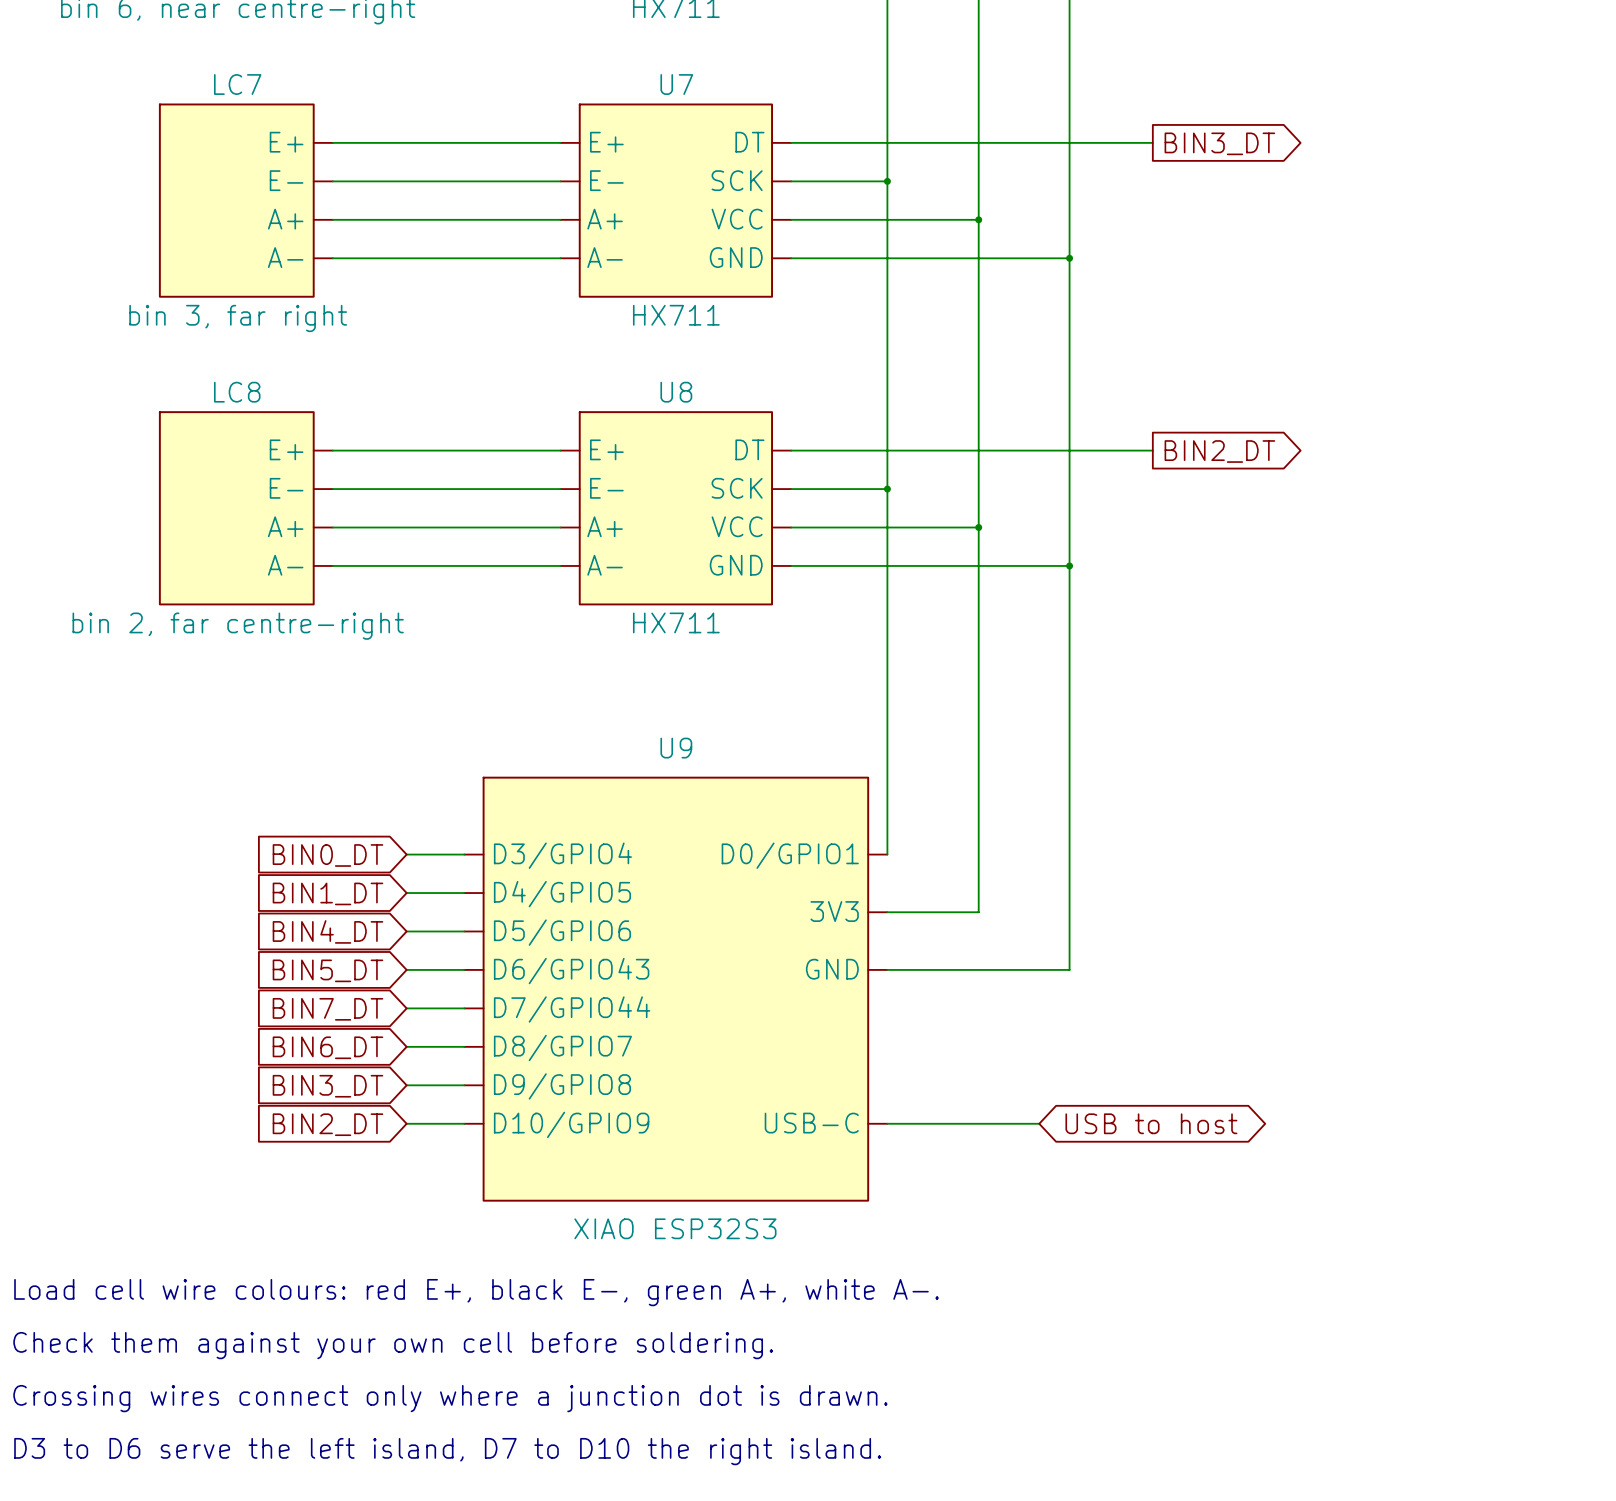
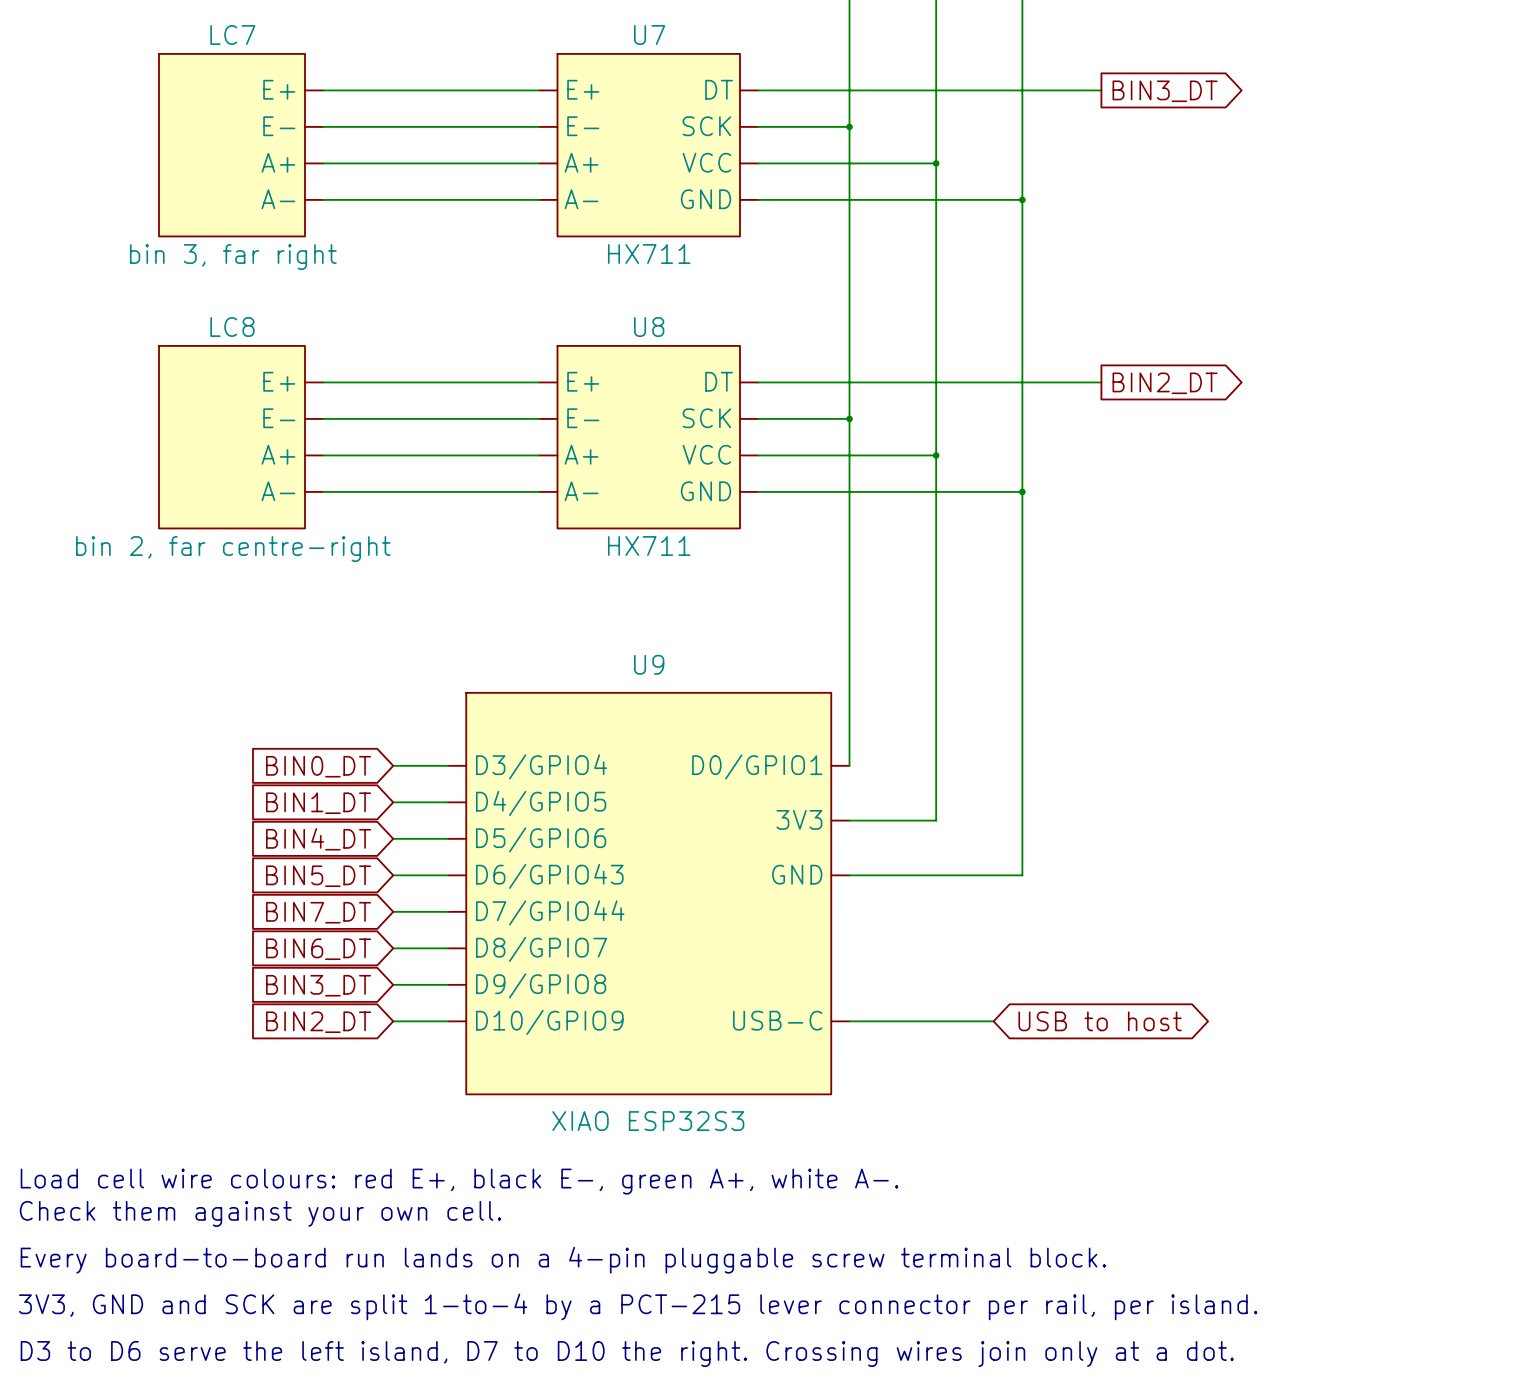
text: Check them against your own cell before soldering. (393, 1345) -> Check them against your own cell. (260, 1213)
text: none -> Every board-to-board run lands on a 4-pin pluggable screw terminal block. (563, 1260)
text: Crossing wires connect only where a junction dot is drawn. (450, 1398) -> none
text: none -> 3V3, GND and SCK are split 1-to-4 by a PCT-215 lever connector per rail, per island. (638, 1306)
text: D3 to D6 serve the left island, D7 to D10 the right island. (447, 1451) -> D3 to D6 serve the left island, D7 to D10 the right. Crossing wires join only at a dot. (627, 1354)

